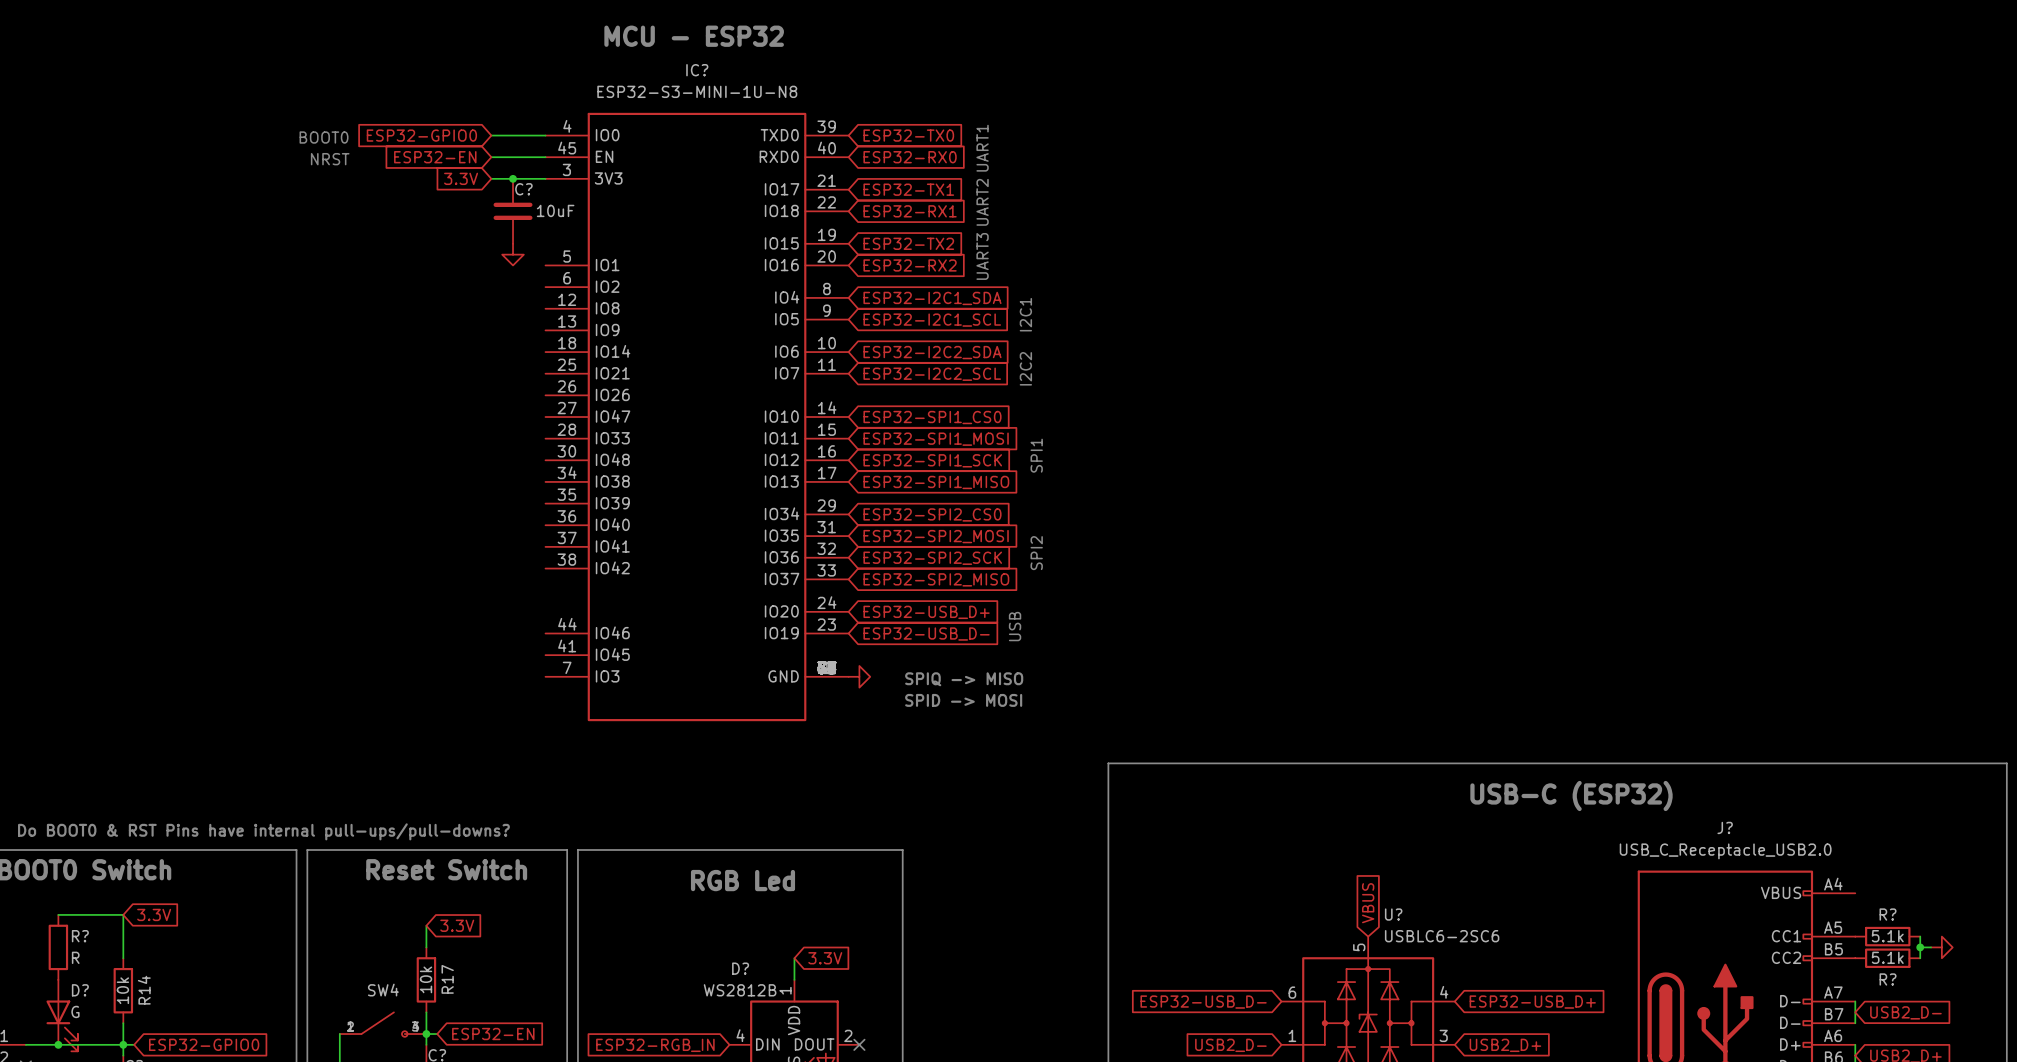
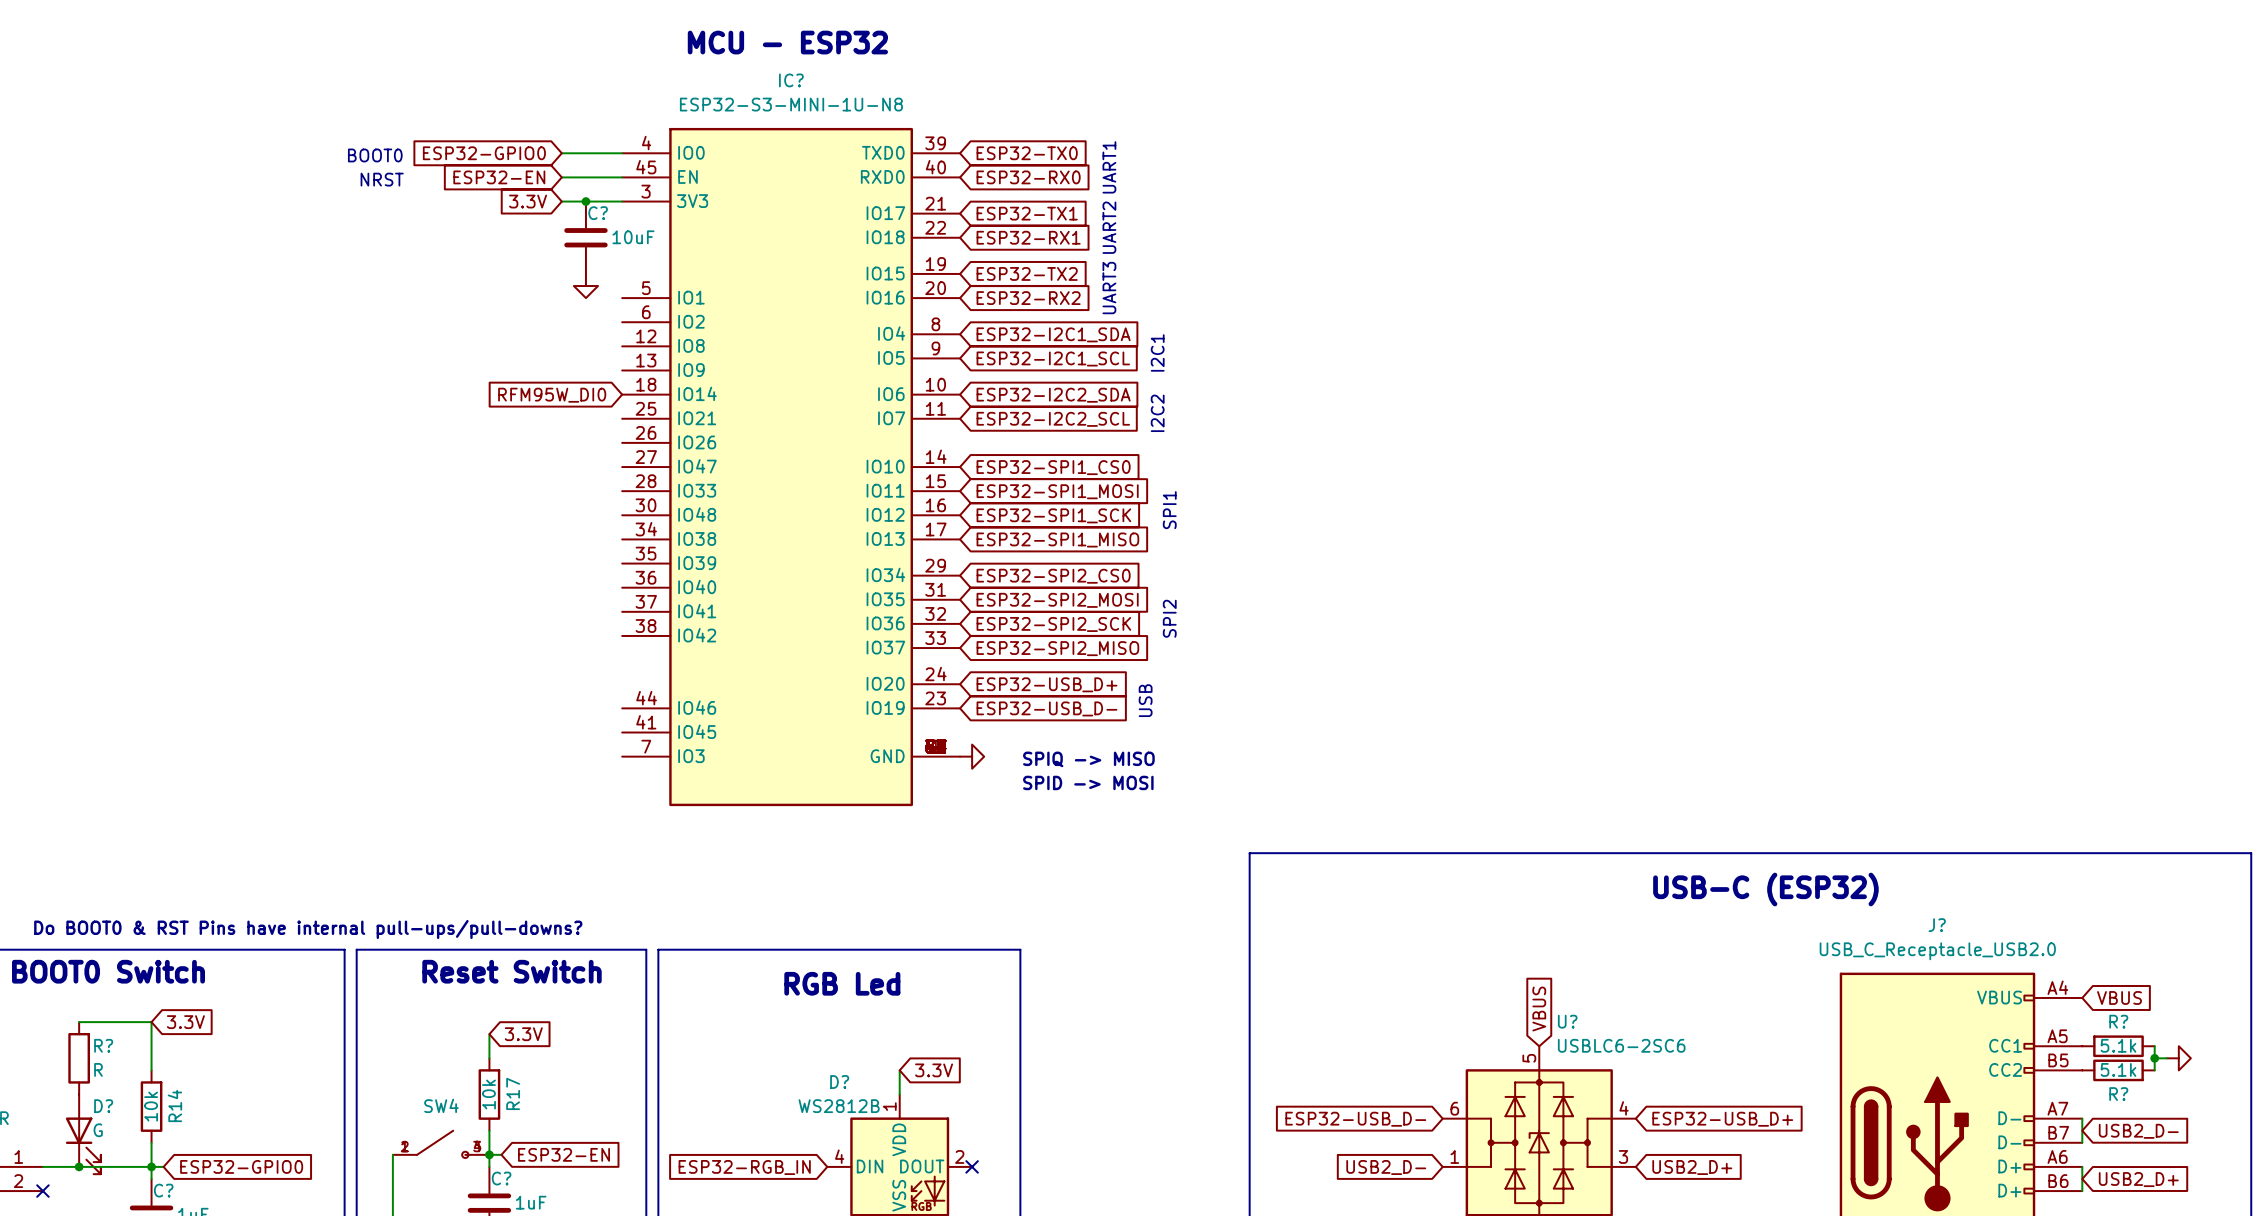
global label: none -> RFM95W_DI0 (552, 395)
global label: none -> VBUS (2119, 997)

